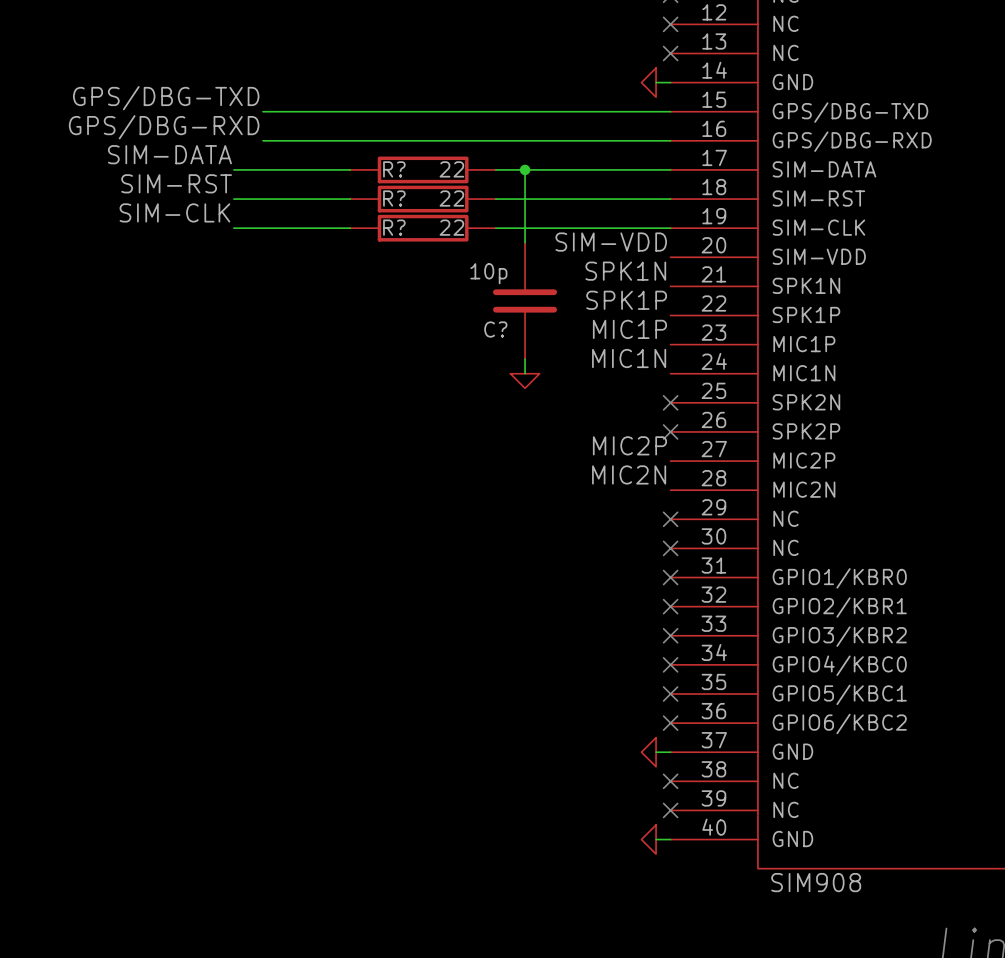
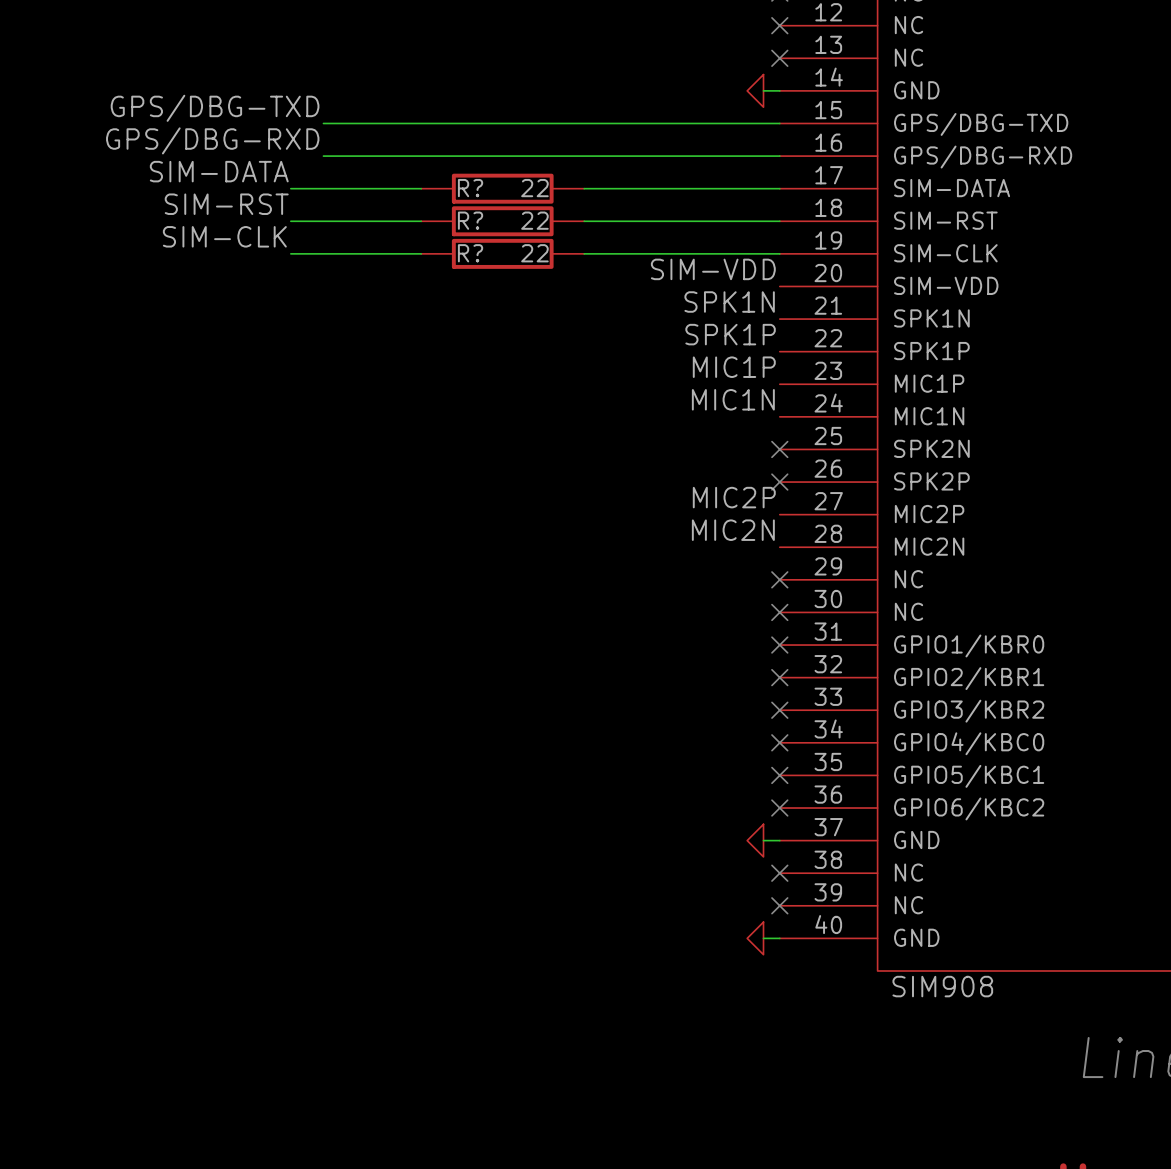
wire: (525, 169) (525, 242) -> none
junction: (525, 169) -> none
C?: 10p (525, 300) -> none
wire: (525, 359) (525, 373) -> none
power symbol: (525, 381) -> none

